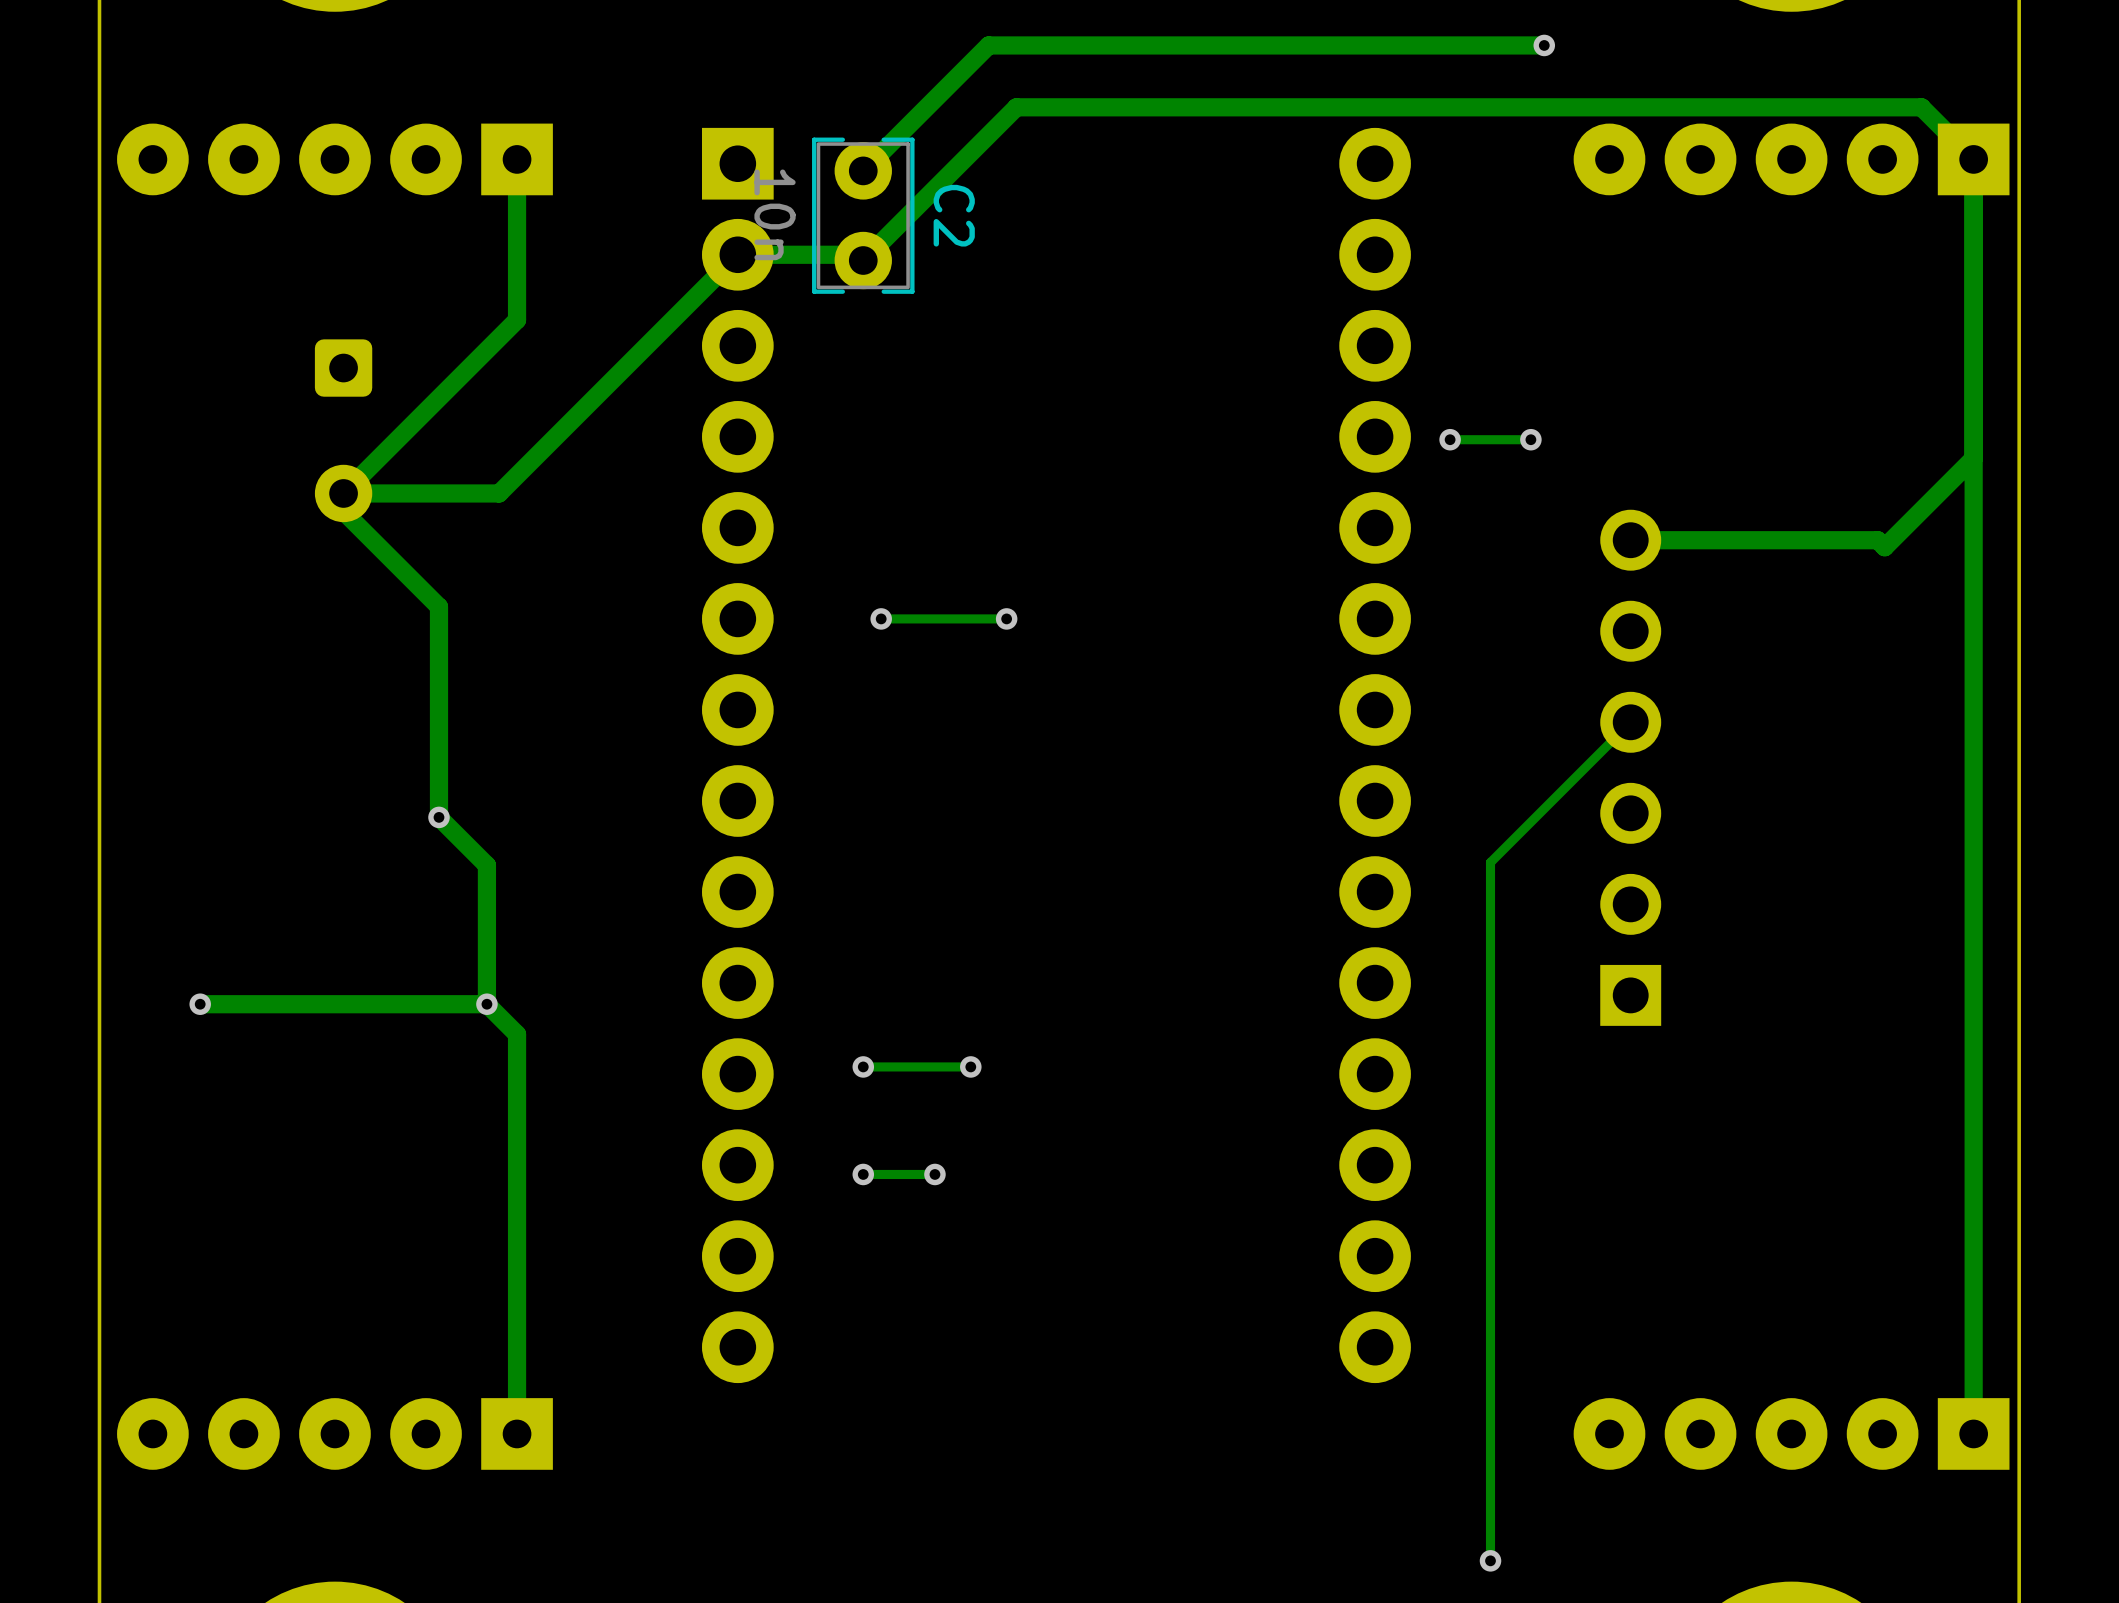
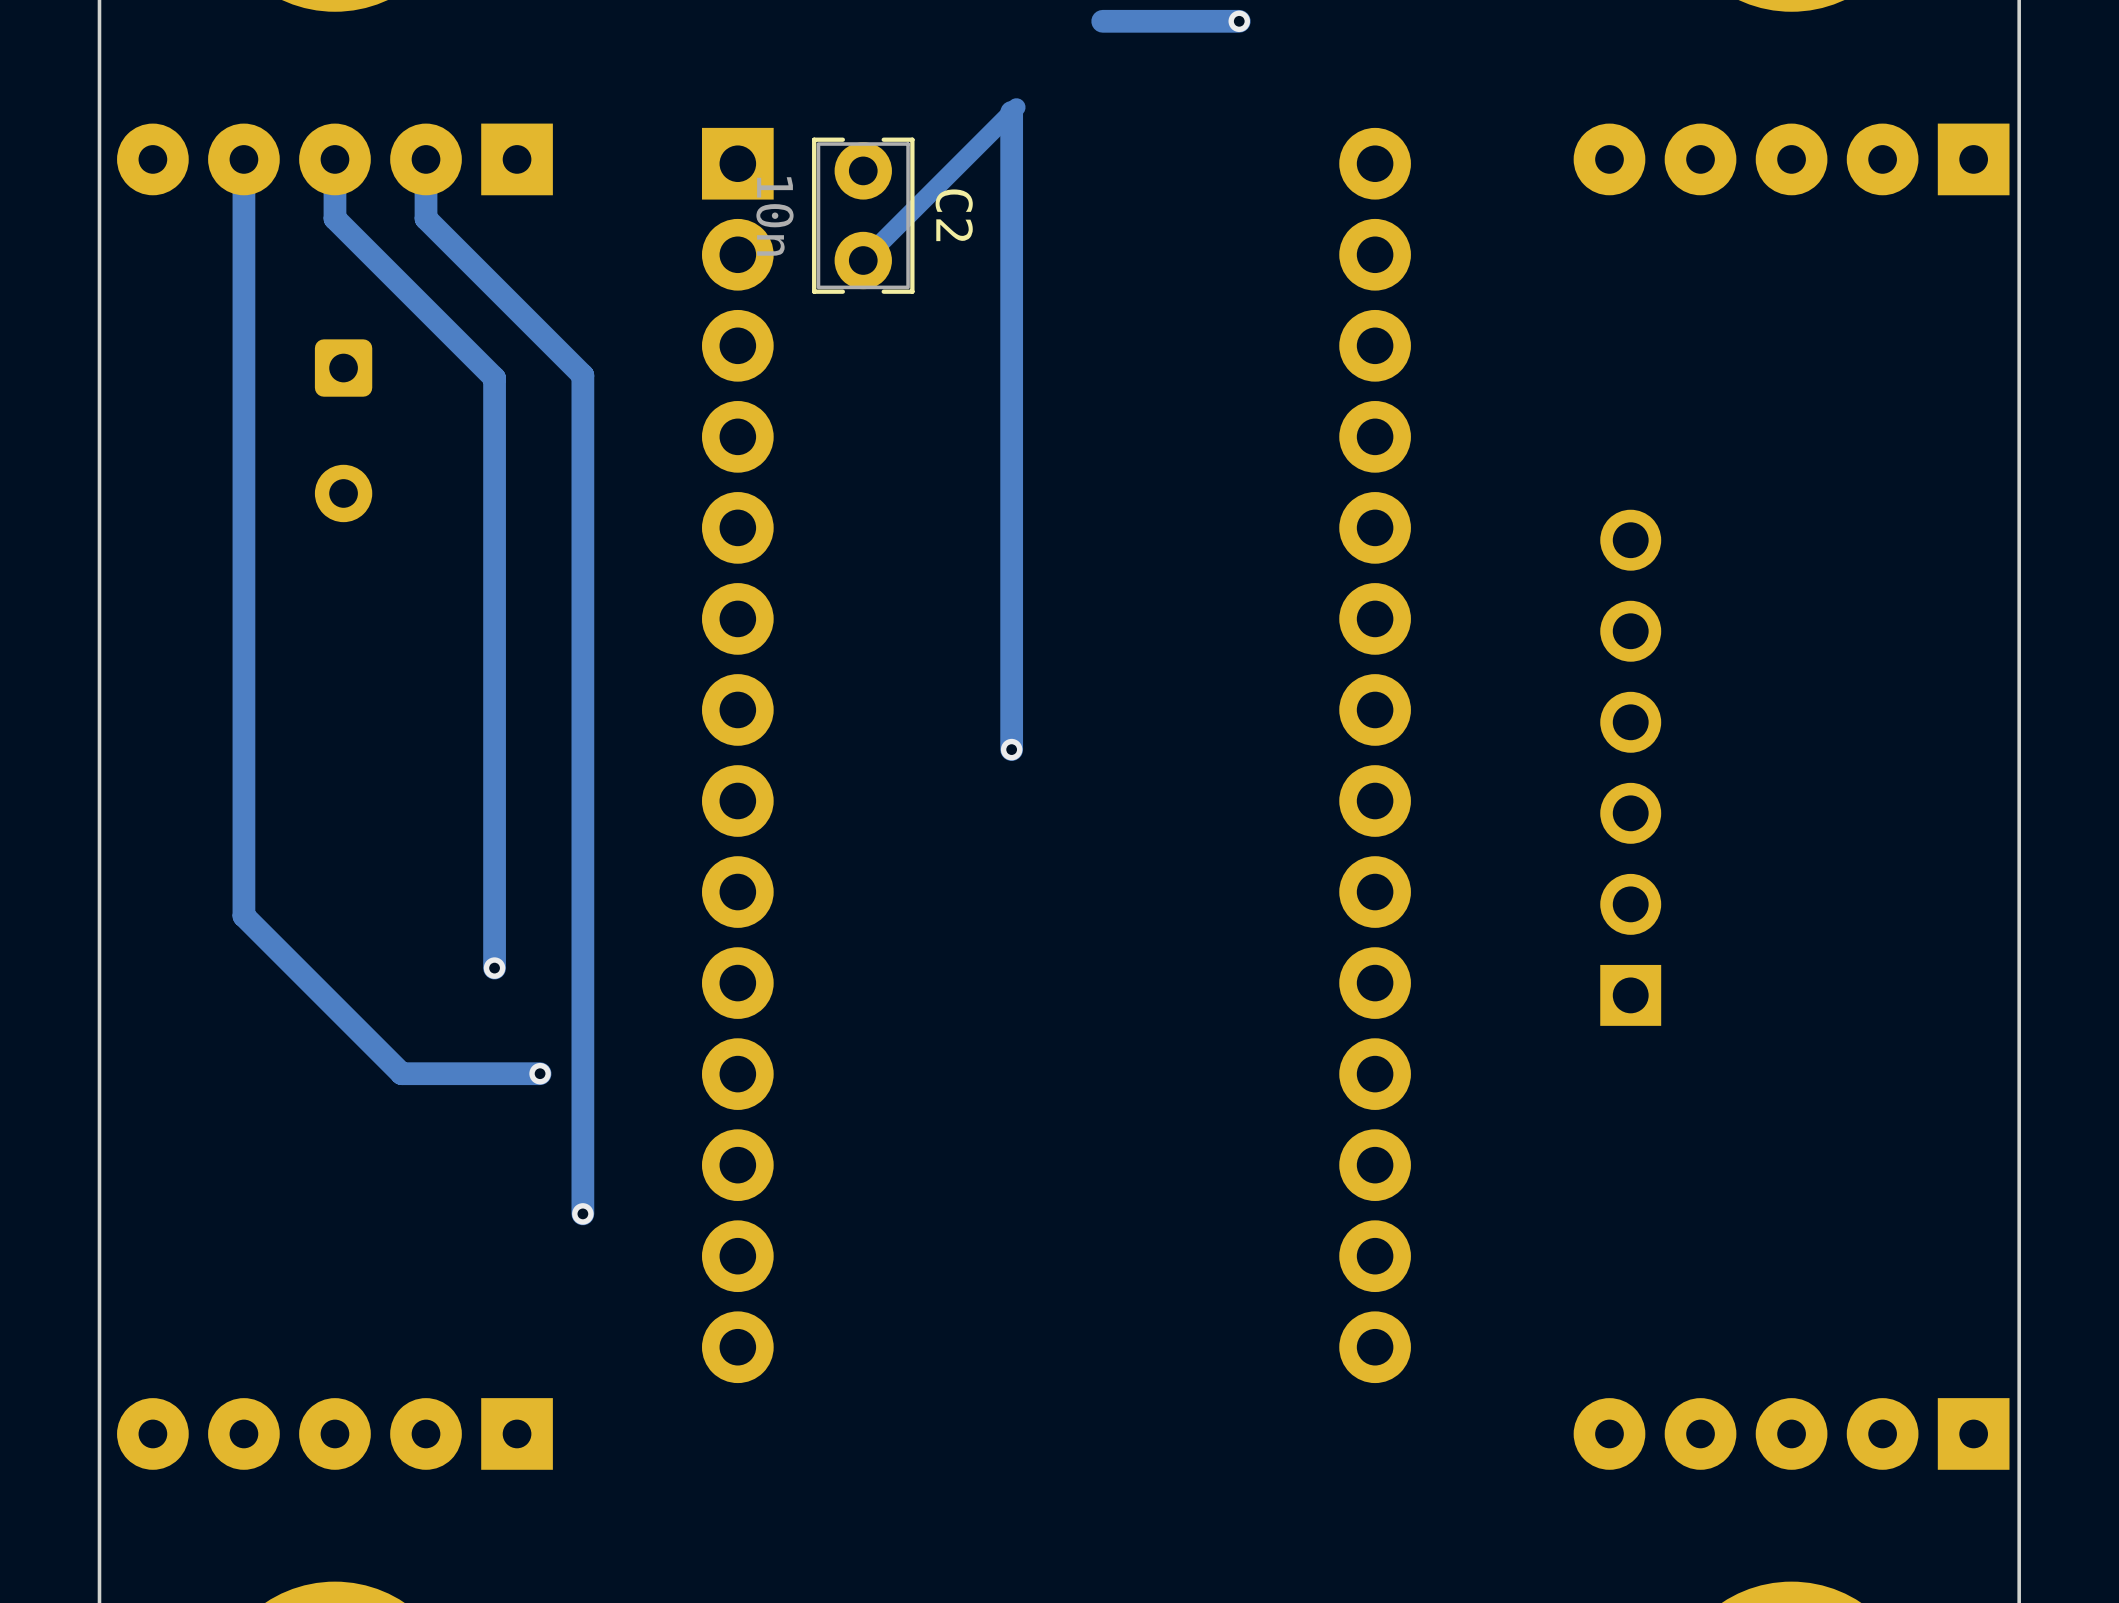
track: none -> (1239, 21) (1102, 21)
via: none -> (1239, 21)
track: (1544, 45) (988, 45) (863, 170) -> none
via: (1544, 45) -> none
track: (1016, 107) (1921, 107) (1973, 159) (1973, 1433) -> none
track: none -> (1011, 112) (1011, 749)
track: none -> (243, 159) (243, 915) (401, 1073) (540, 1073)
track: none -> (334, 159) (334, 218) (494, 378) (494, 968)
track: none -> (426, 159) (426, 218) (582, 375) (582, 1213)
track: (517, 159) (517, 320) (343, 493) -> none
track: (863, 260) (857, 254) (737, 254) (499, 493) (343, 493) -> none
via: (1450, 439) -> none
track: (1530, 439) (1450, 439) -> none
via: (1530, 439) -> none
track: (1973, 458) (1884, 547) (1877, 540) (1630, 540) -> none
track: (343, 493) (343, 511) (439, 606) (439, 817) (486, 865) (486, 1004) -> none
via: (881, 618) -> none
track: (1006, 618) (881, 618) -> none
via: (1006, 618) -> none
track: (1630, 722) (1490, 862) (1490, 1560) -> none
via: none -> (1011, 749)
via: (439, 817) -> none
via: (200, 1004) -> none
track: (486, 1004) (517, 1034) (517, 1433) -> none
track: (486, 1004) (200, 1004) -> none
via position: (486, 1004) -> (494, 968)
via: (863, 1066) -> none
track: (970, 1066) (863, 1066) -> none
via: (970, 1066) -> none
via: none -> (540, 1073)
via: (863, 1174) -> none
track: (934, 1174) (863, 1174) -> none
via: (934, 1174) -> none
via: none -> (582, 1213)
via: (1490, 1560) -> none

